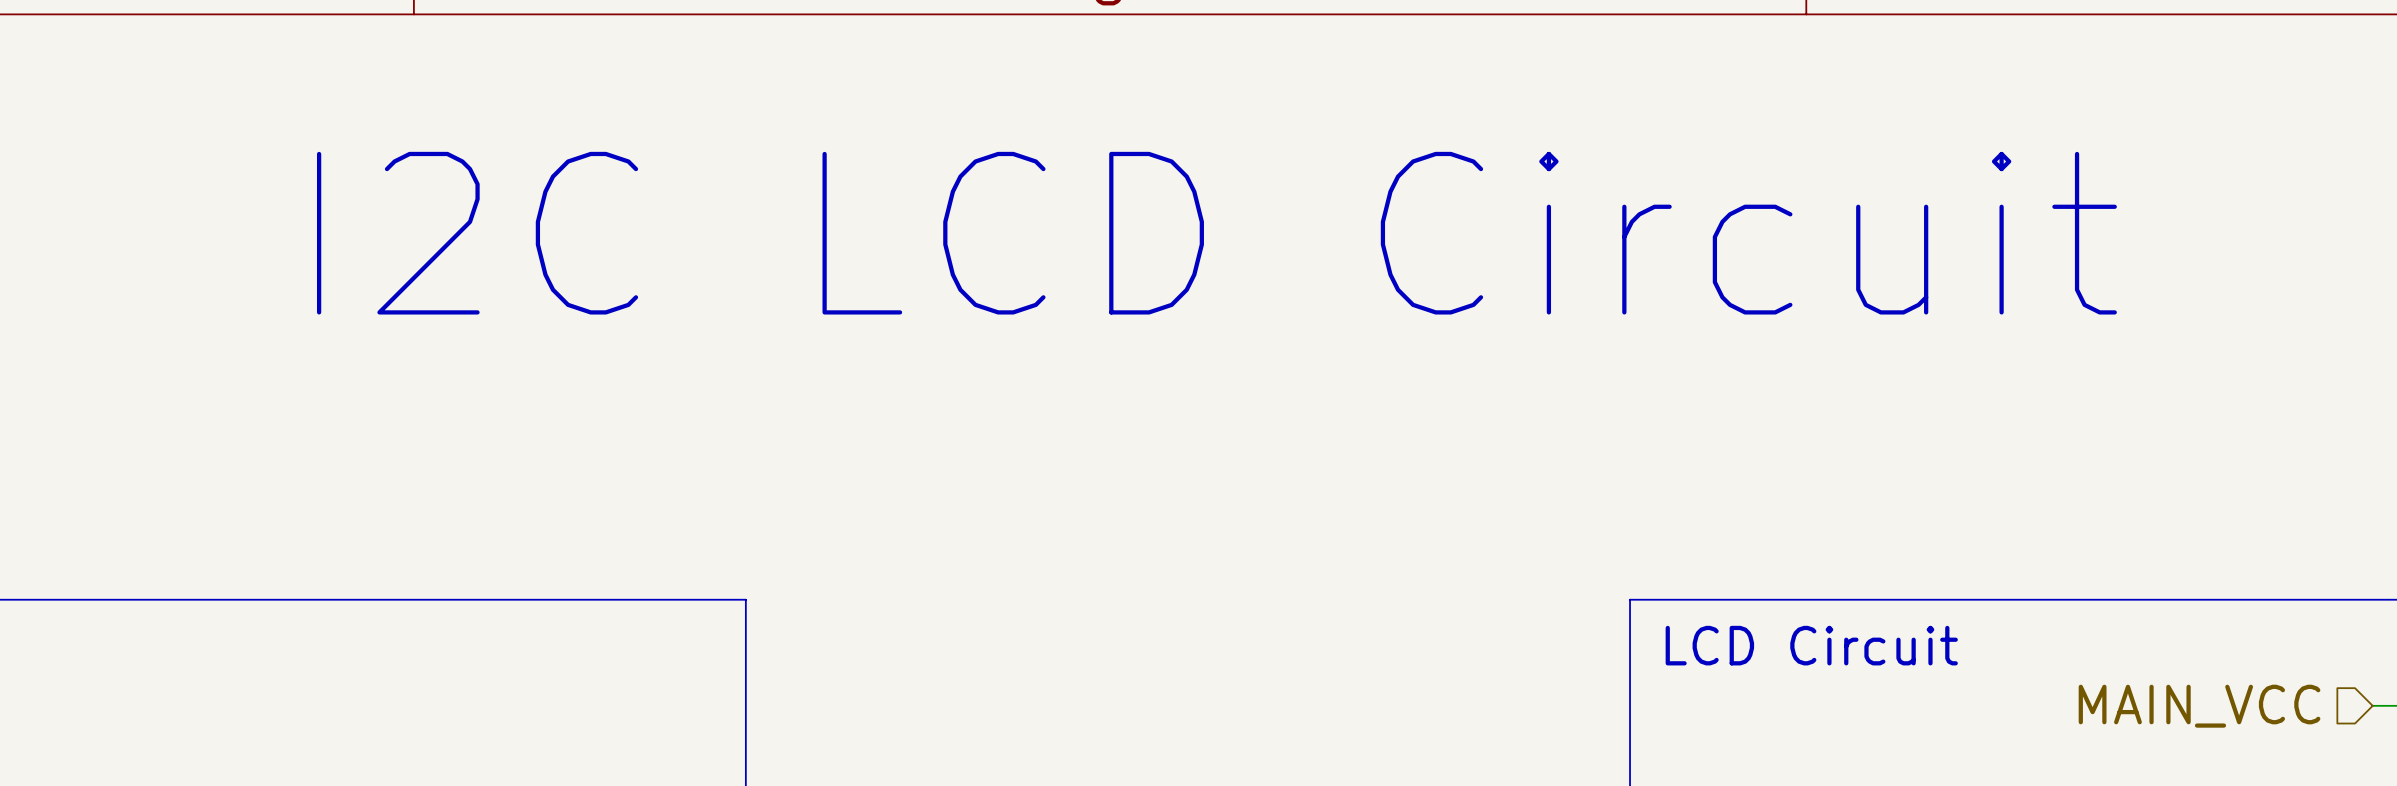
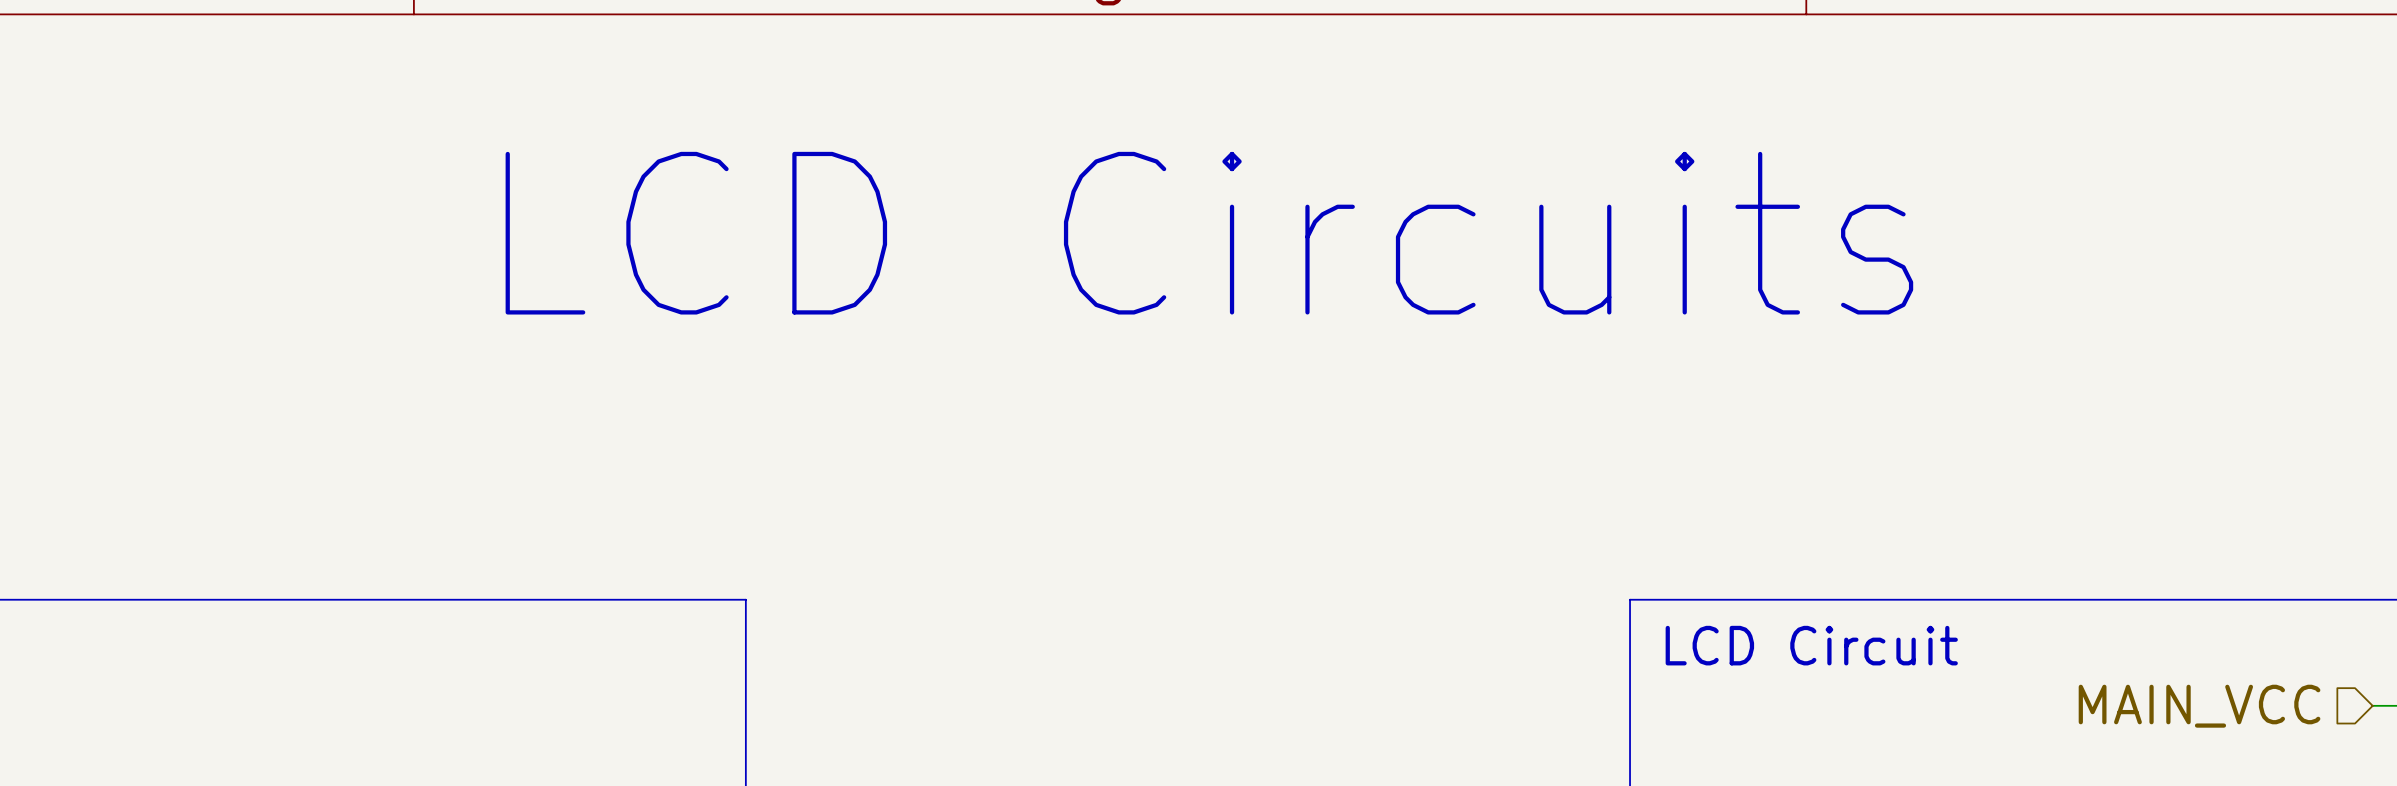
text: I2C LCD Circuit (1216, 233) -> LCD Circuits (1209, 233)

